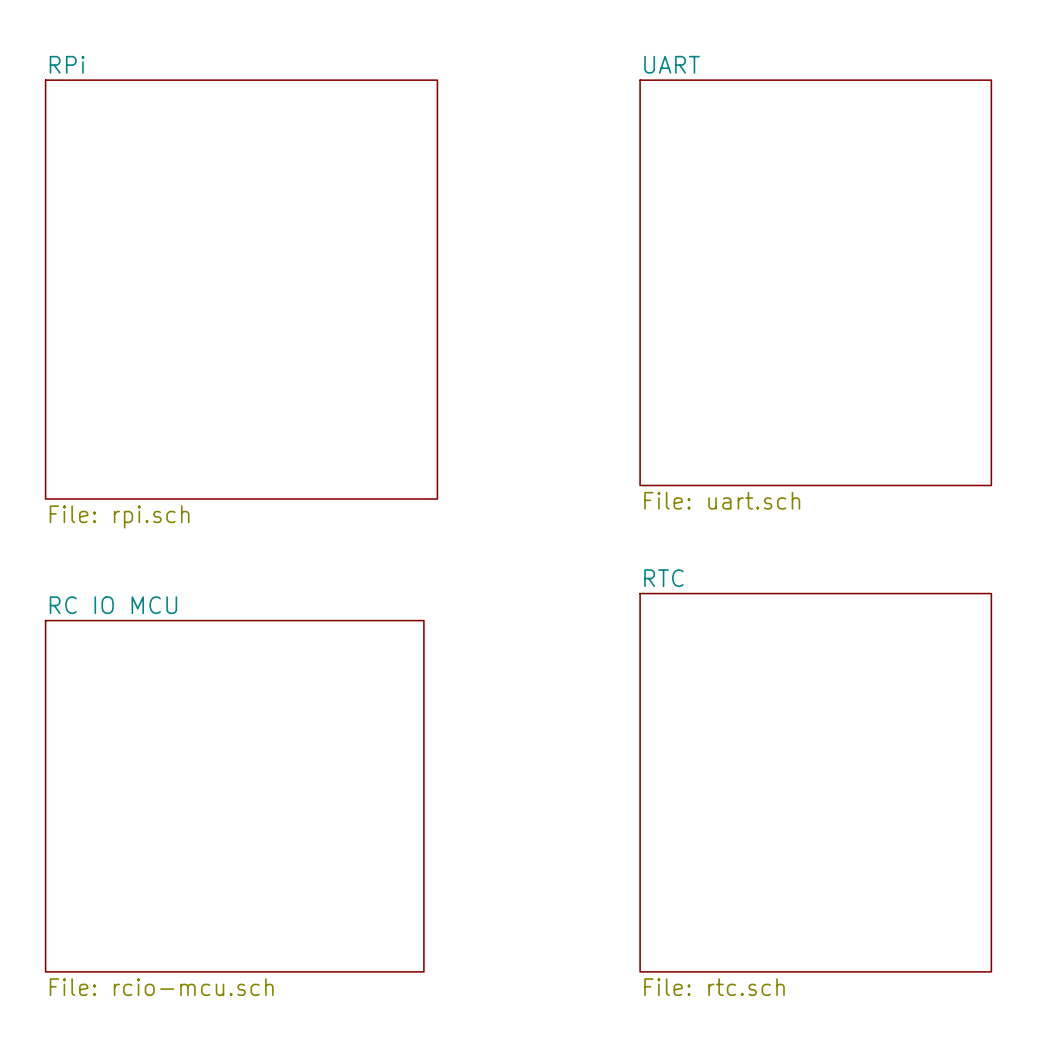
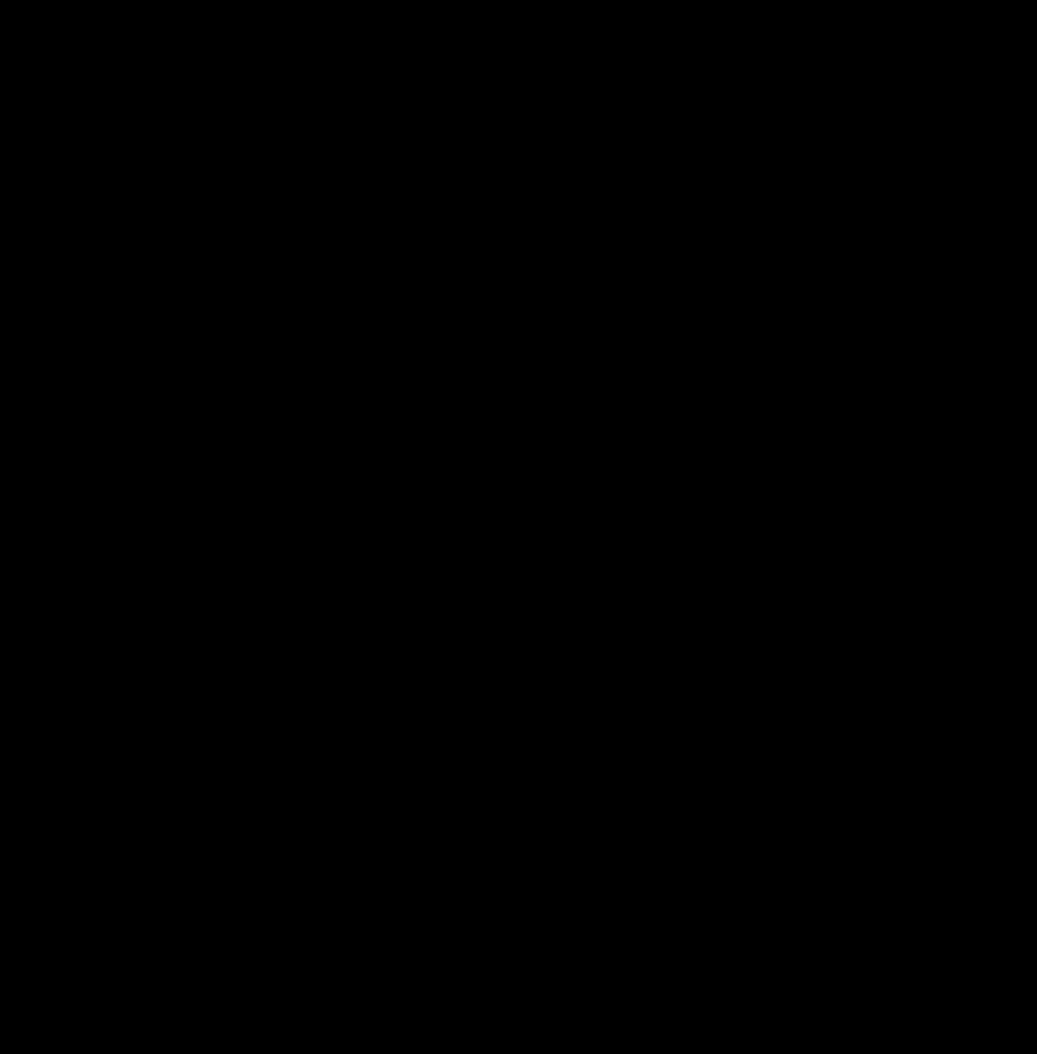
sheet UART: File: uart.sch (815, 282) -> none
sheet RPi: File: rpi.sch (241, 289) -> none
sheet RTC: File: rtc.sch (815, 782) -> none
sheet RC IO MCU: File: rcio-mcu.sch (234, 796) -> none

